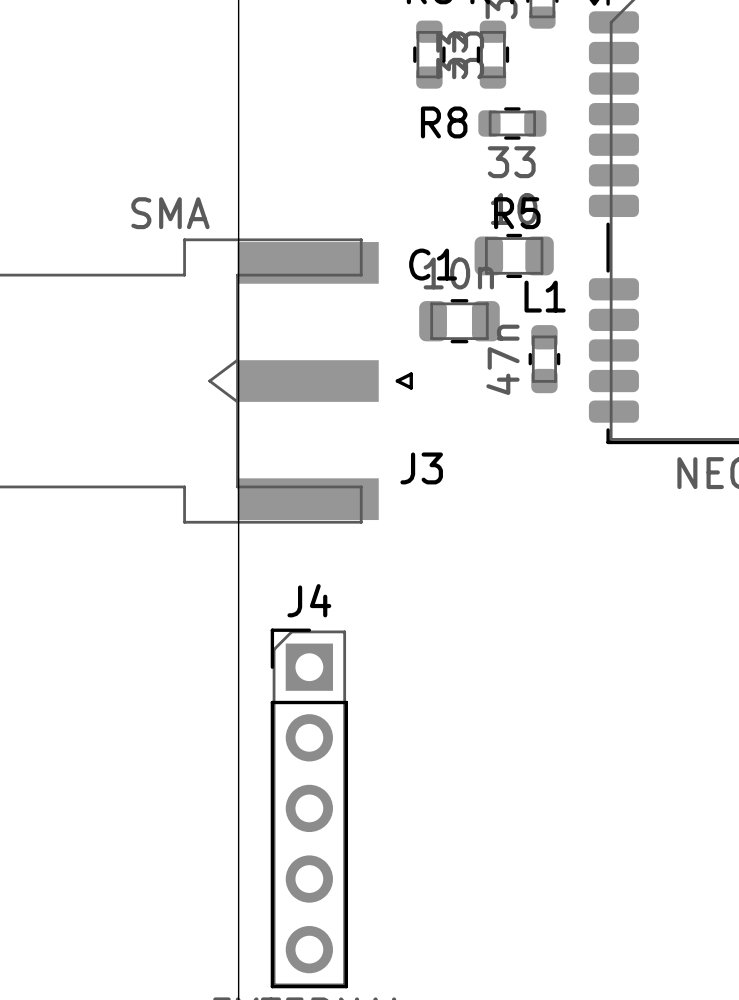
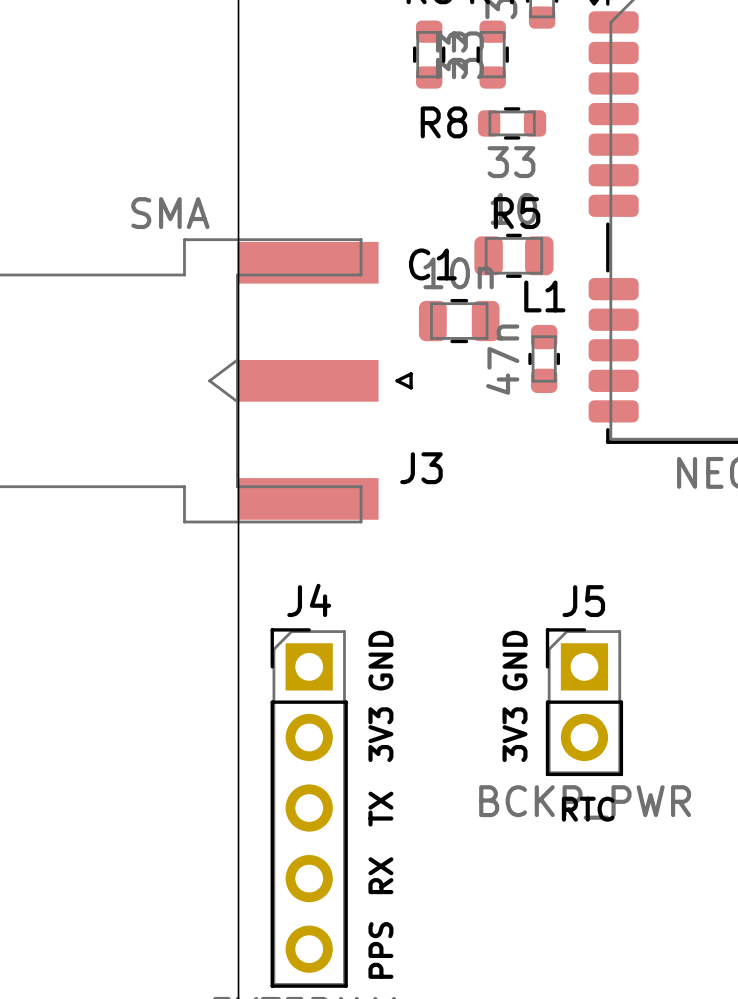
text: none -> GND (380, 660)
text: none -> GND (515, 660)
J5: none -> BCKP_PWR (584, 702)
text: none -> 3V3 (380, 734)
text: none -> 3V3 (515, 734)
text: none -> TX (380, 809)
text: none -> RTC (588, 809)
text: none -> RX (380, 875)
text: none -> PPS (380, 950)

